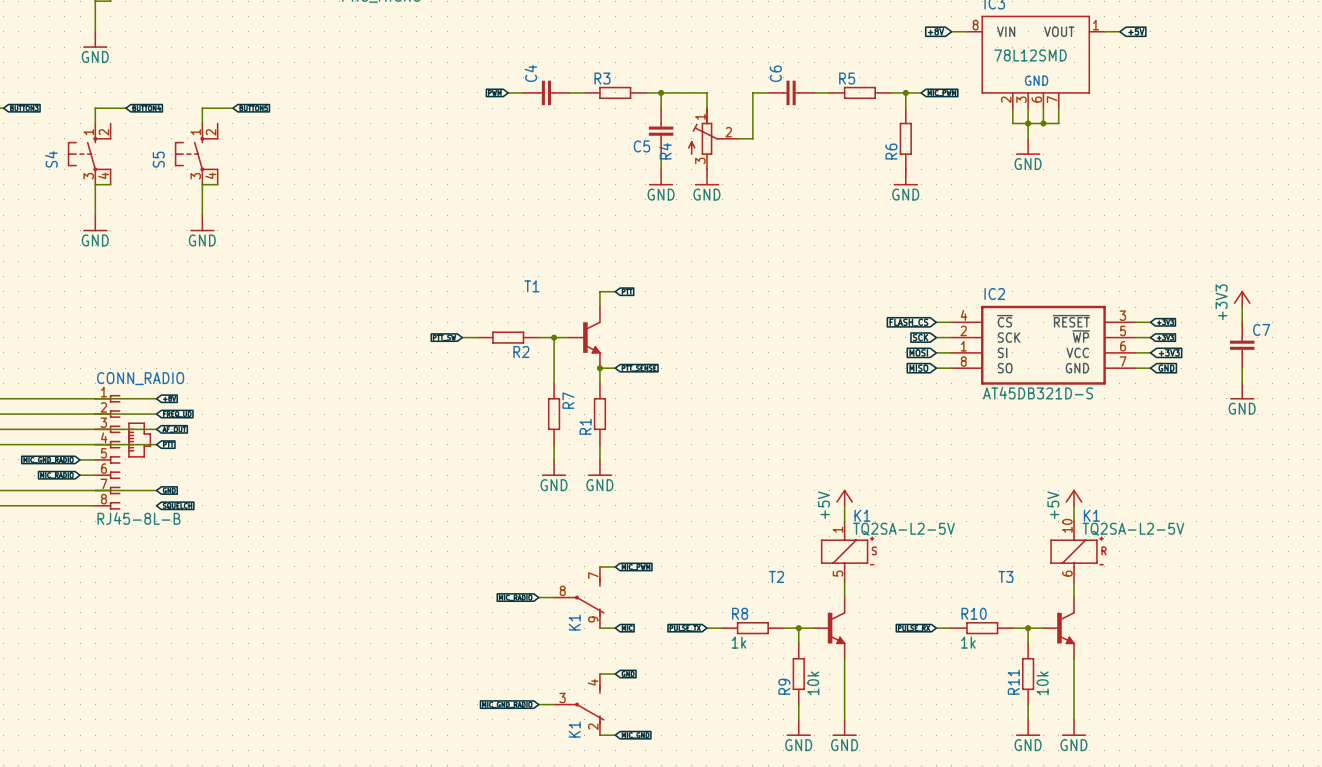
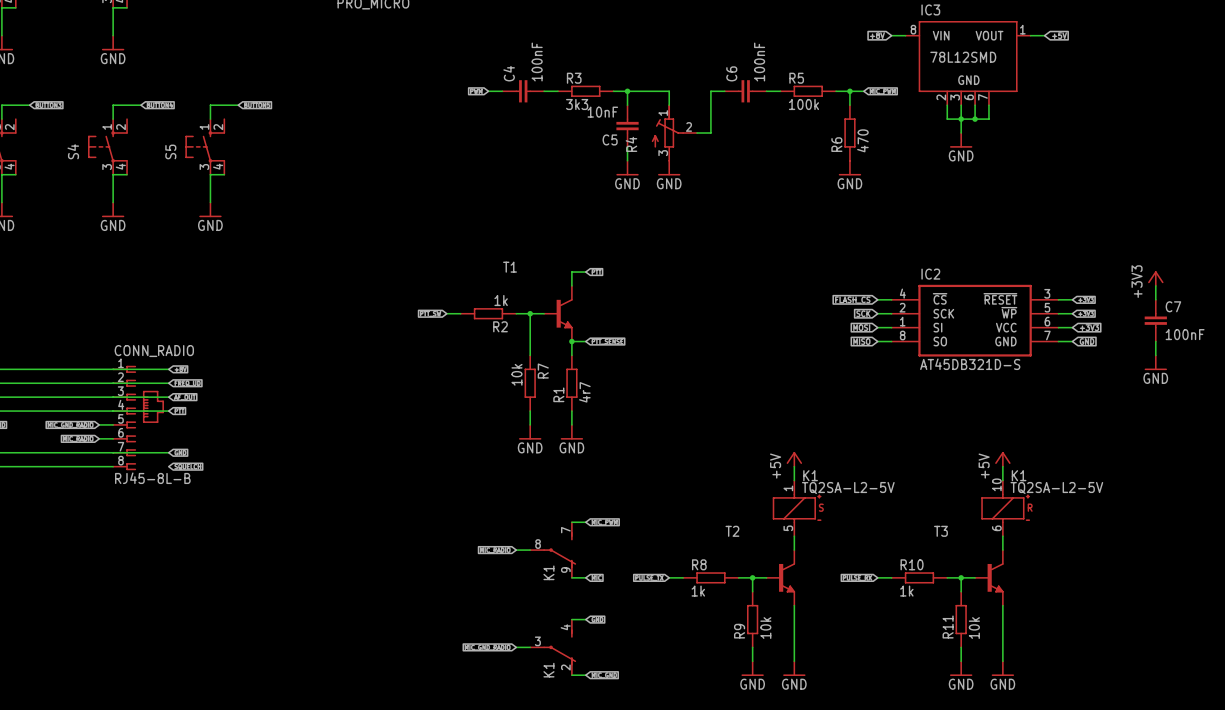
C4 value: none -> 100nF (537, 62)
C6 value: none -> 100nF (759, 62)
R3 value: none -> 3k3 (577, 104)
R5 value: none -> 100k (803, 104)
C5 value: none -> 10nF (602, 112)
R6 value: none -> 470 (862, 140)
R2 value: none -> 1k (501, 300)
C7 value: none -> 100nF (1185, 334)
R7 value: none -> 10k (516, 374)
R1 value: none -> 4r7 (584, 392)

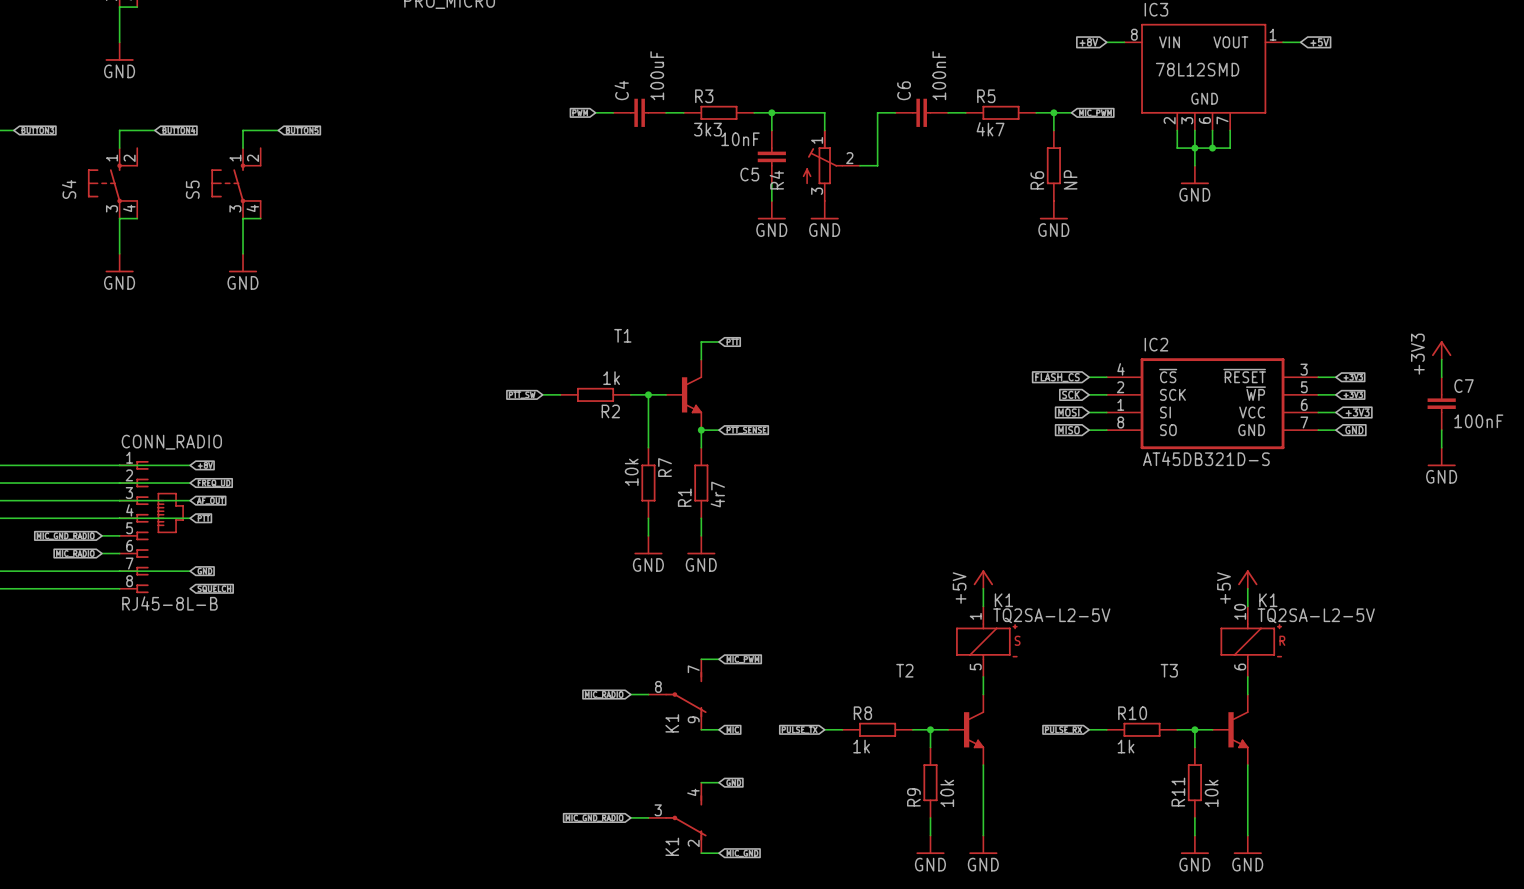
C4 value: 100nF (537, 62) -> 100uF (657, 75)
R5 value: 100k (803, 104) -> 4k7 (990, 129)
R6 value: 470 (862, 140) -> NP (1070, 179)

